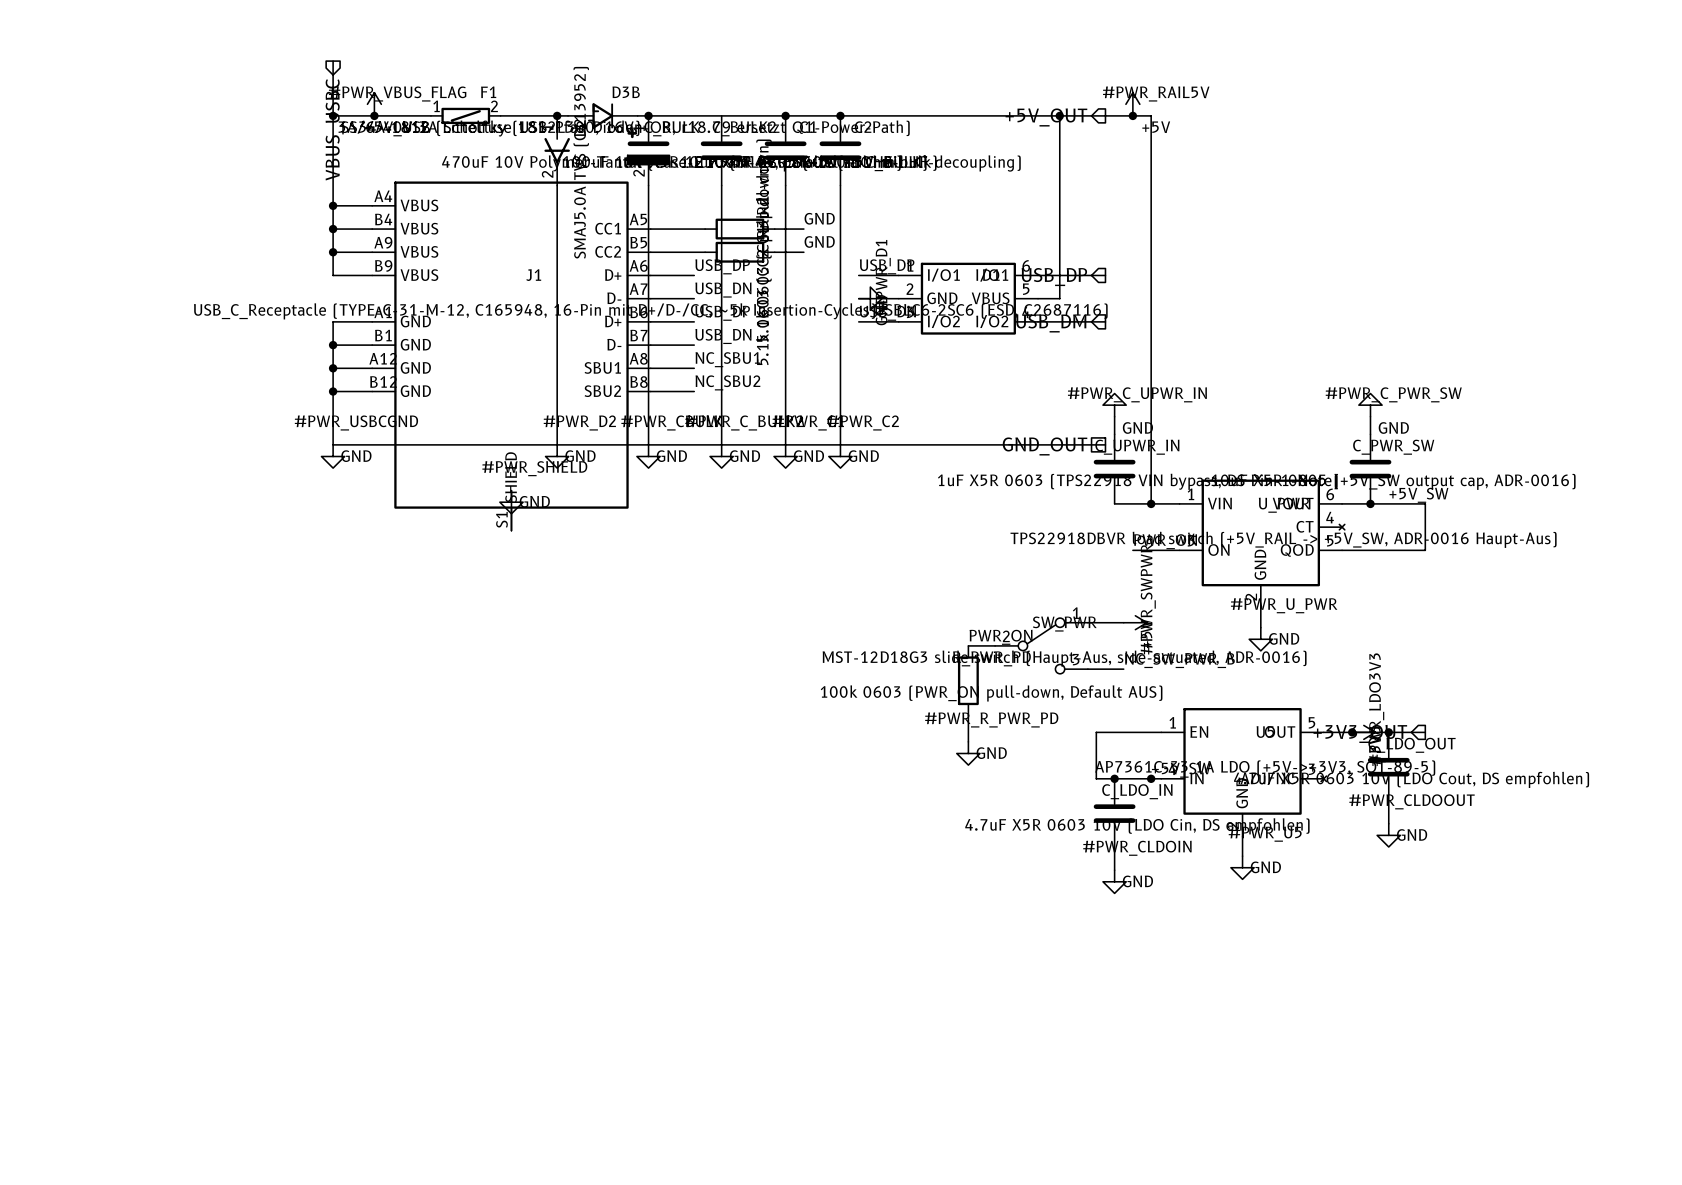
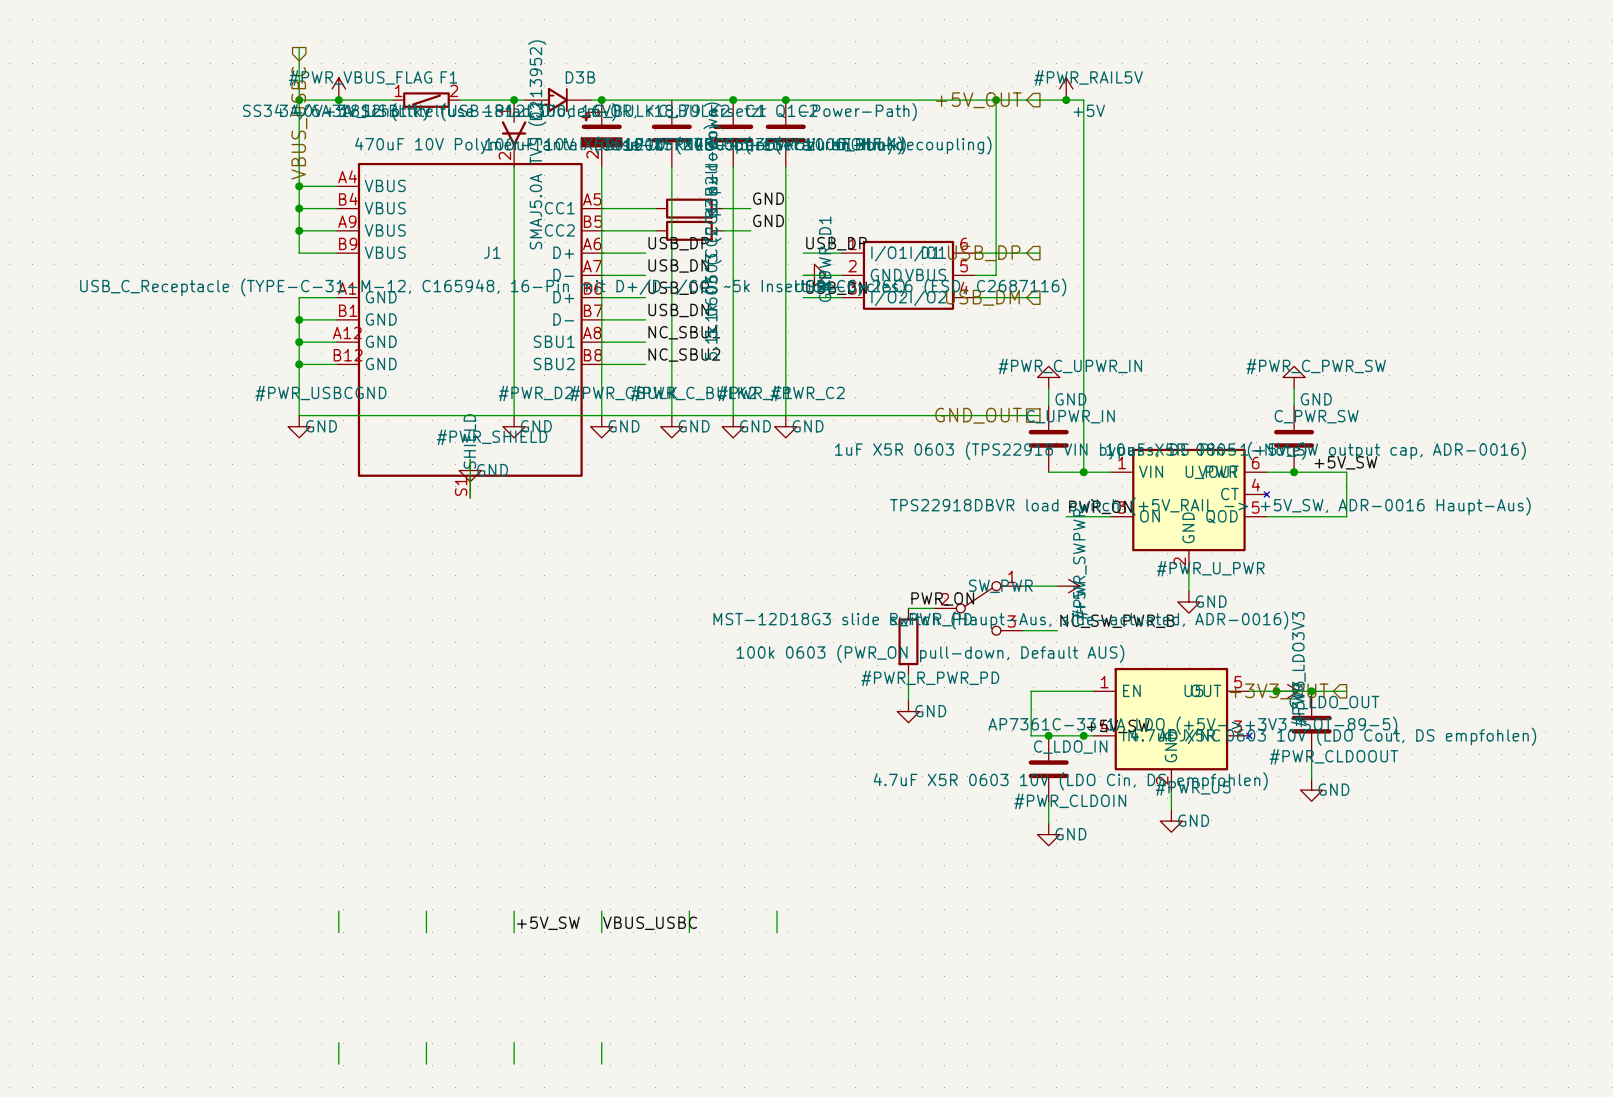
wire: none -> (338, 911) (338, 932)
wire: none -> (426, 911) (426, 932)
wire: none -> (514, 911) (514, 932)
wire: none -> (601, 911) (601, 932)
wire: none -> (689, 911) (689, 932)
wire: none -> (777, 911) (777, 932)
label: none -> +5V_SW (548, 923)
label: none -> VBUS_USBC (650, 923)
wire: none -> (338, 1042) (338, 1064)
wire: none -> (426, 1042) (426, 1064)
wire: none -> (514, 1042) (514, 1064)
wire: none -> (601, 1042) (601, 1064)

